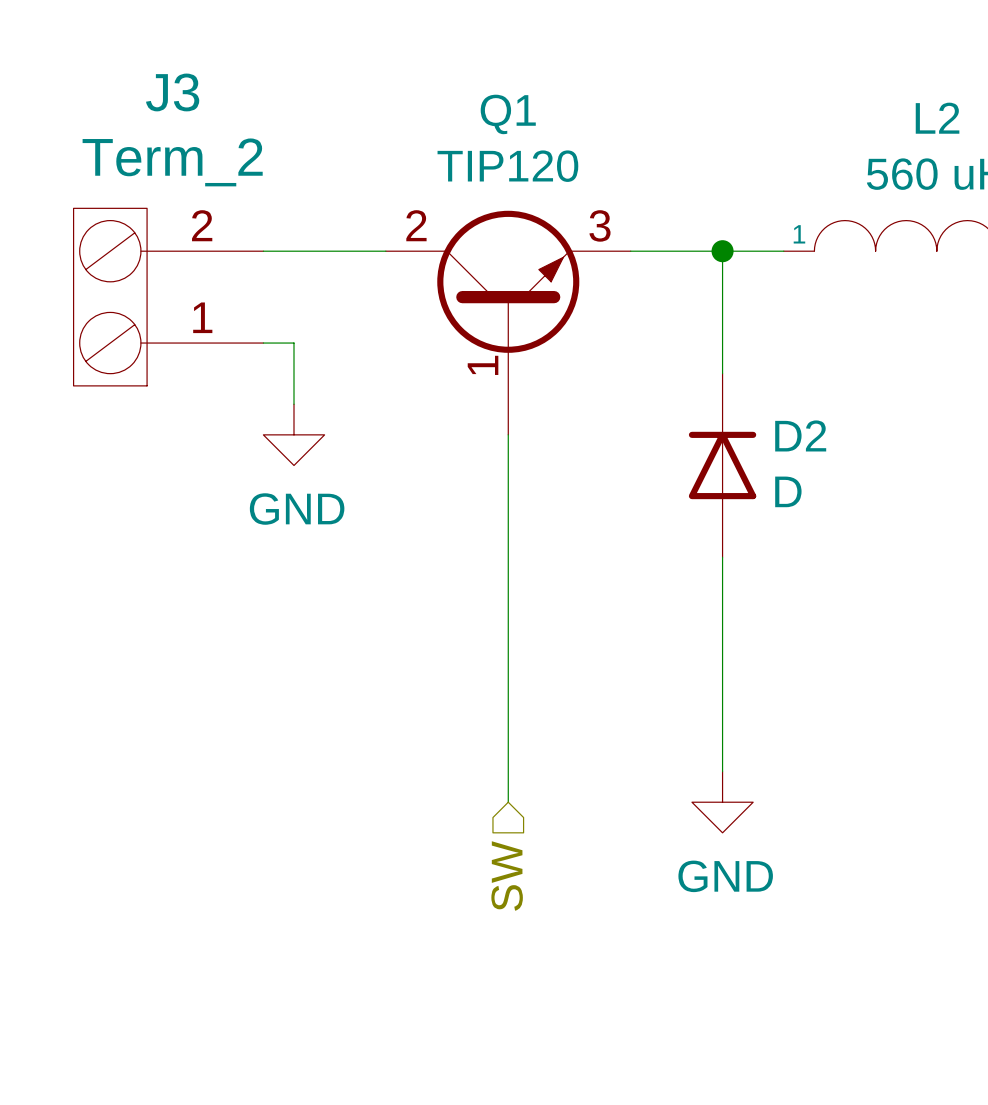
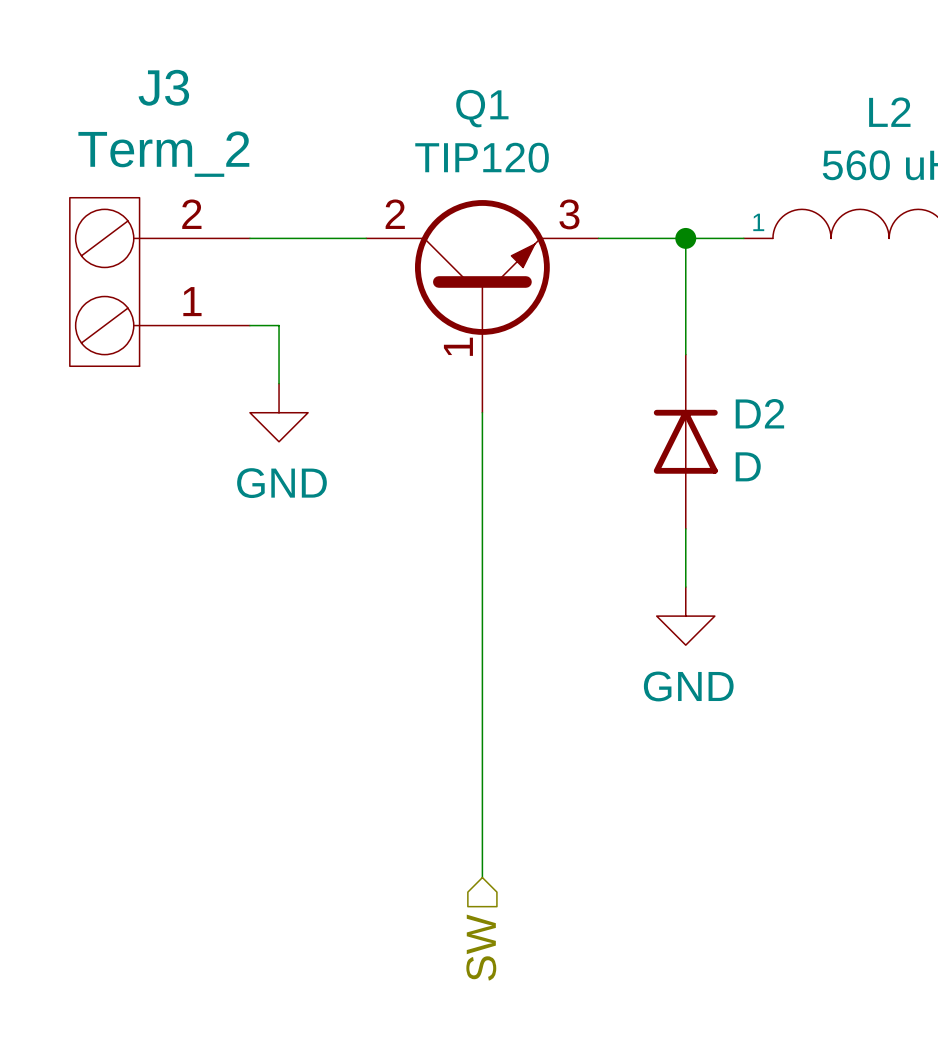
wire: (722, 618) (722, 771) -> none
wire: none -> (482, 761) (482, 877)
power symbol position: GND (722, 802) -> GND (685, 616)
hierarchical label position: SW (507, 875) -> SW (481, 947)

